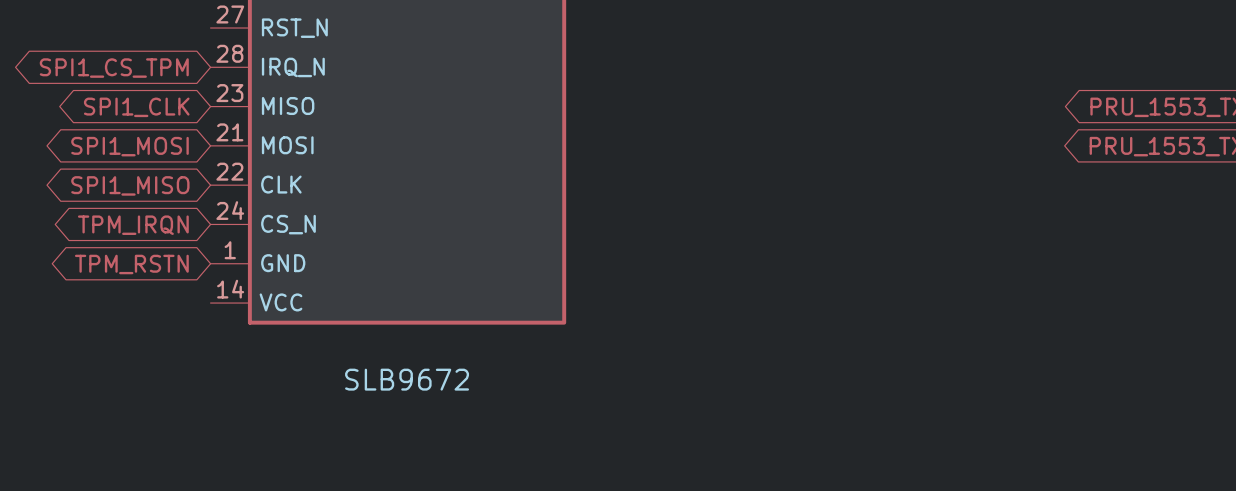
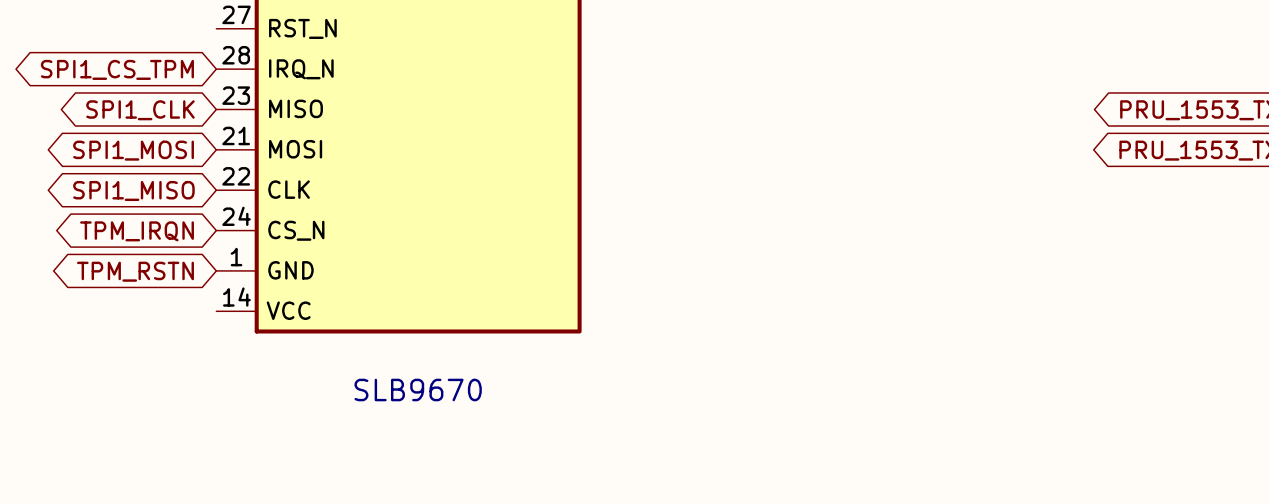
part value: SLB9672 (407, 379) -> SLB9670 (418, 390)

